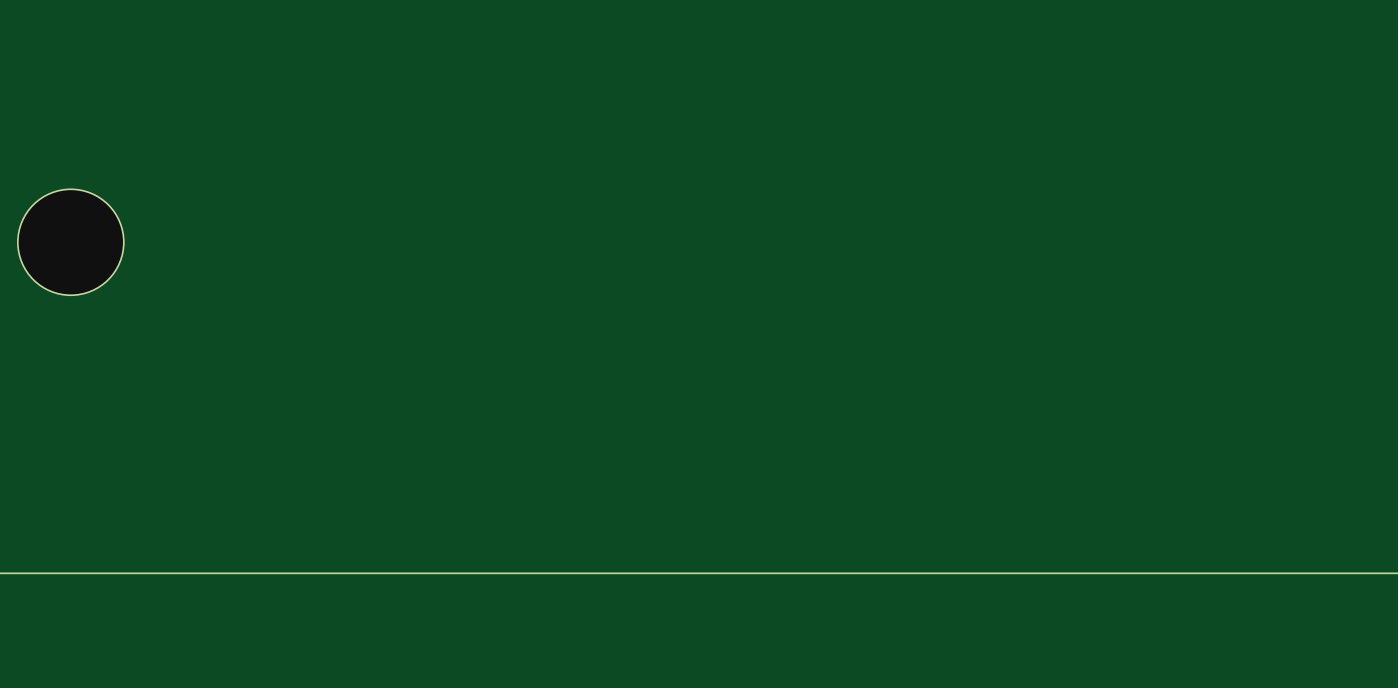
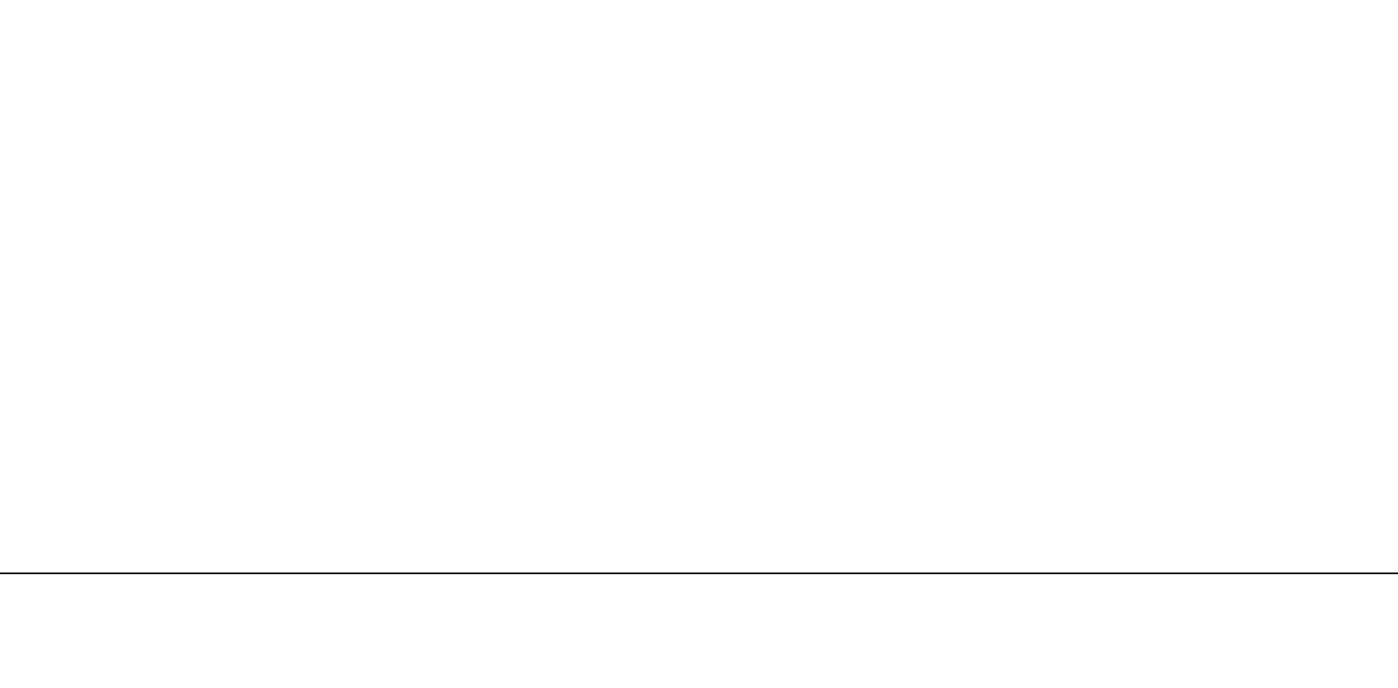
part: (70, 242) -> none

